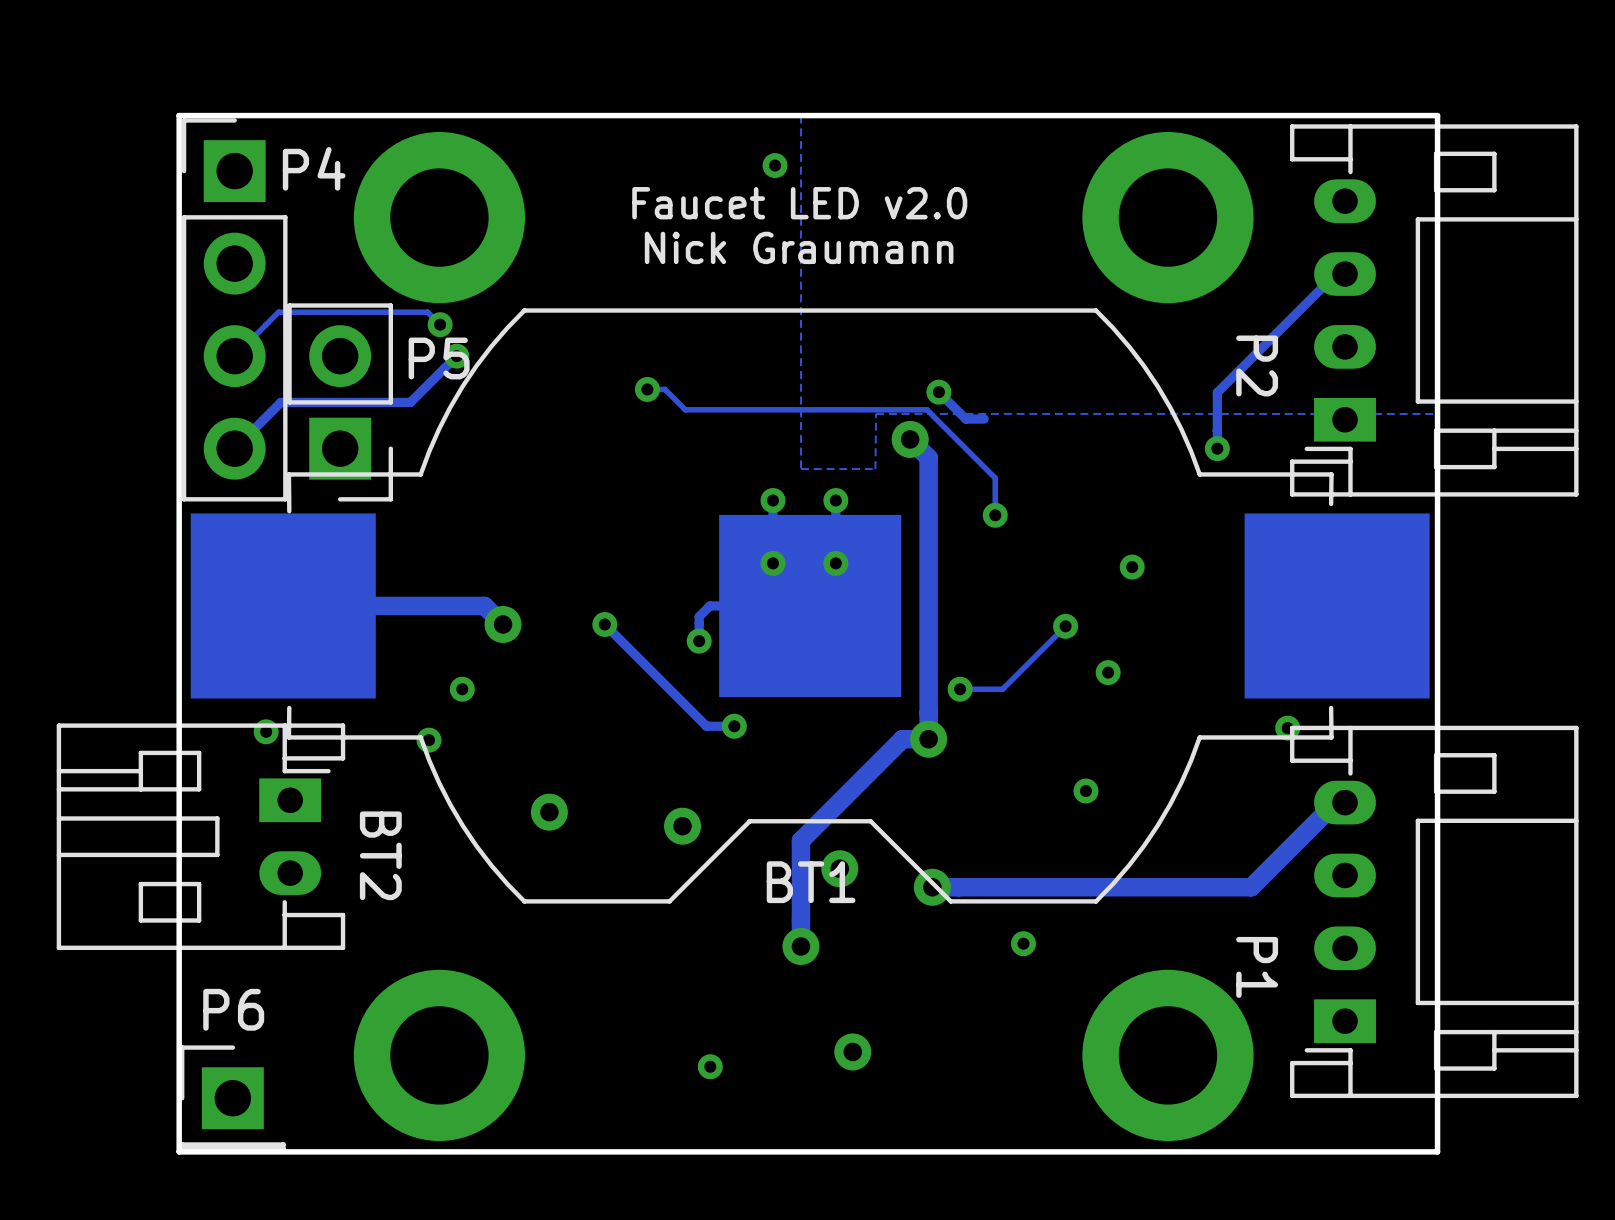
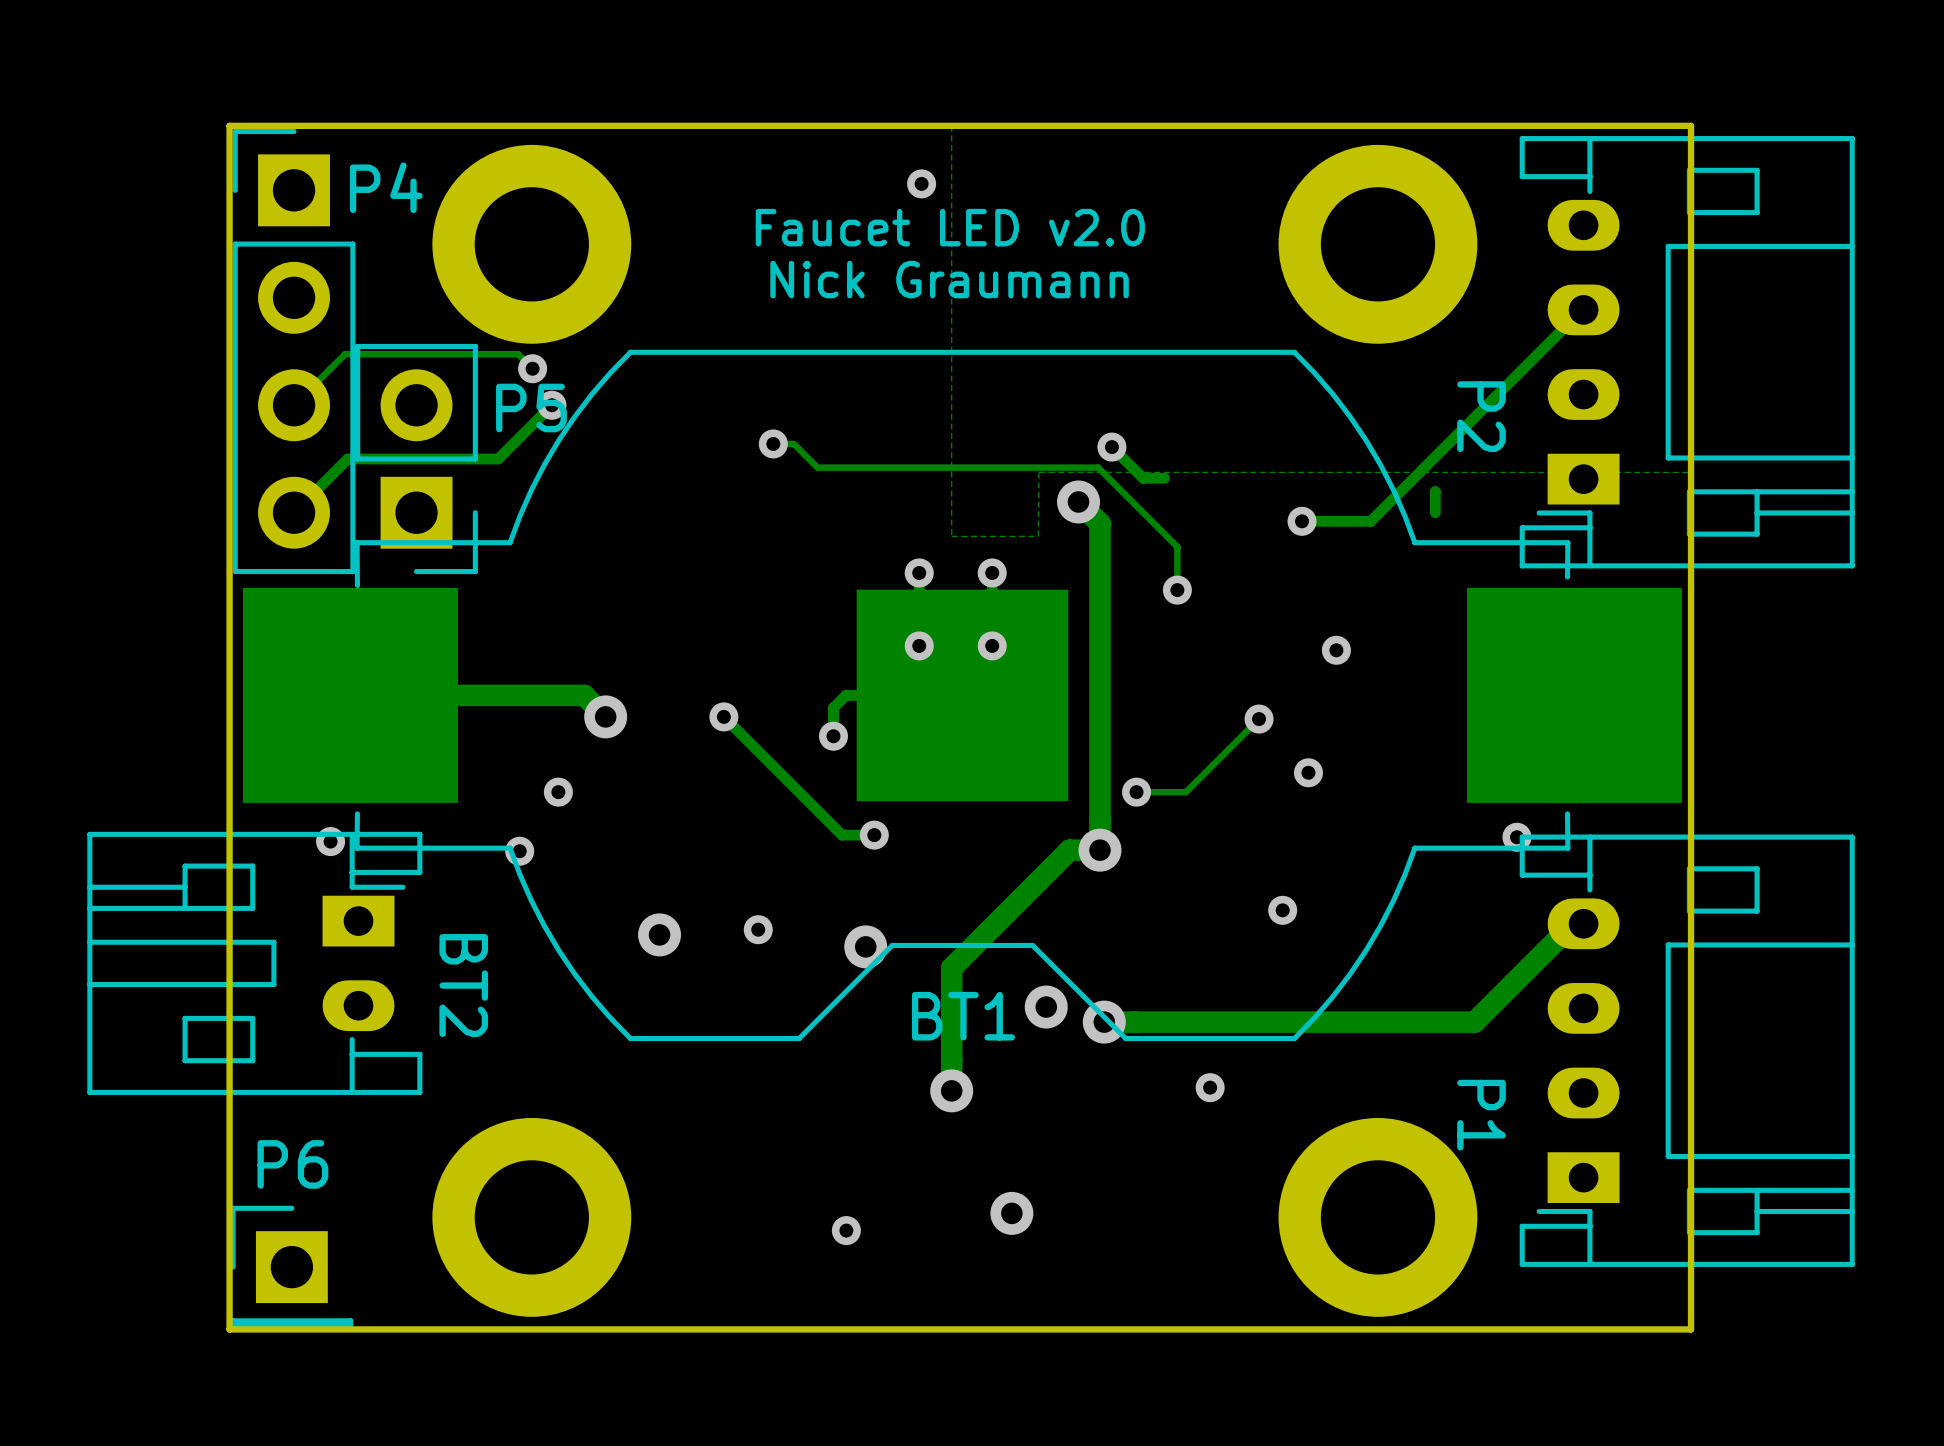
track: (1335, 274) (1217, 392) (1217, 430) -> none
track: none -> (1582, 309) (1370, 521) (1302, 521)
via position: (1217, 448) -> (1302, 521)
via: none -> (758, 929)
via position: (682, 826) -> (865, 946)
via position: (839, 868) -> (1046, 1007)

